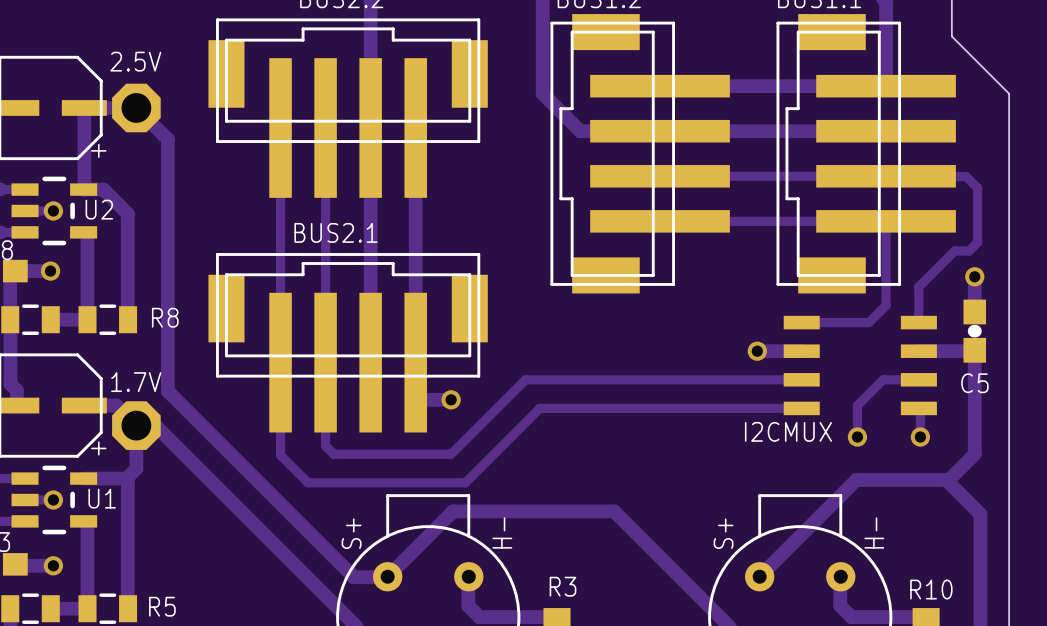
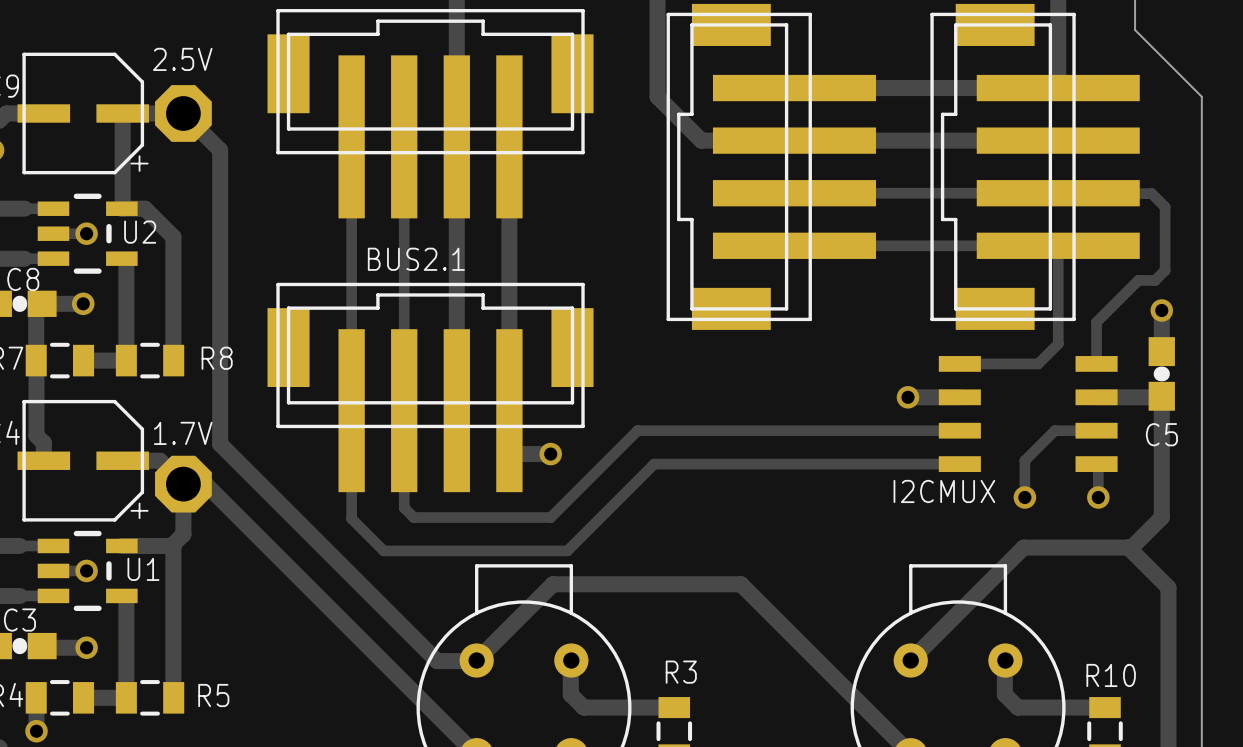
part text: H- (502, 532) -> none
part text: H- (874, 532) -> none
part text: S+ (351, 533) -> none
part text: S+ (723, 533) -> none

